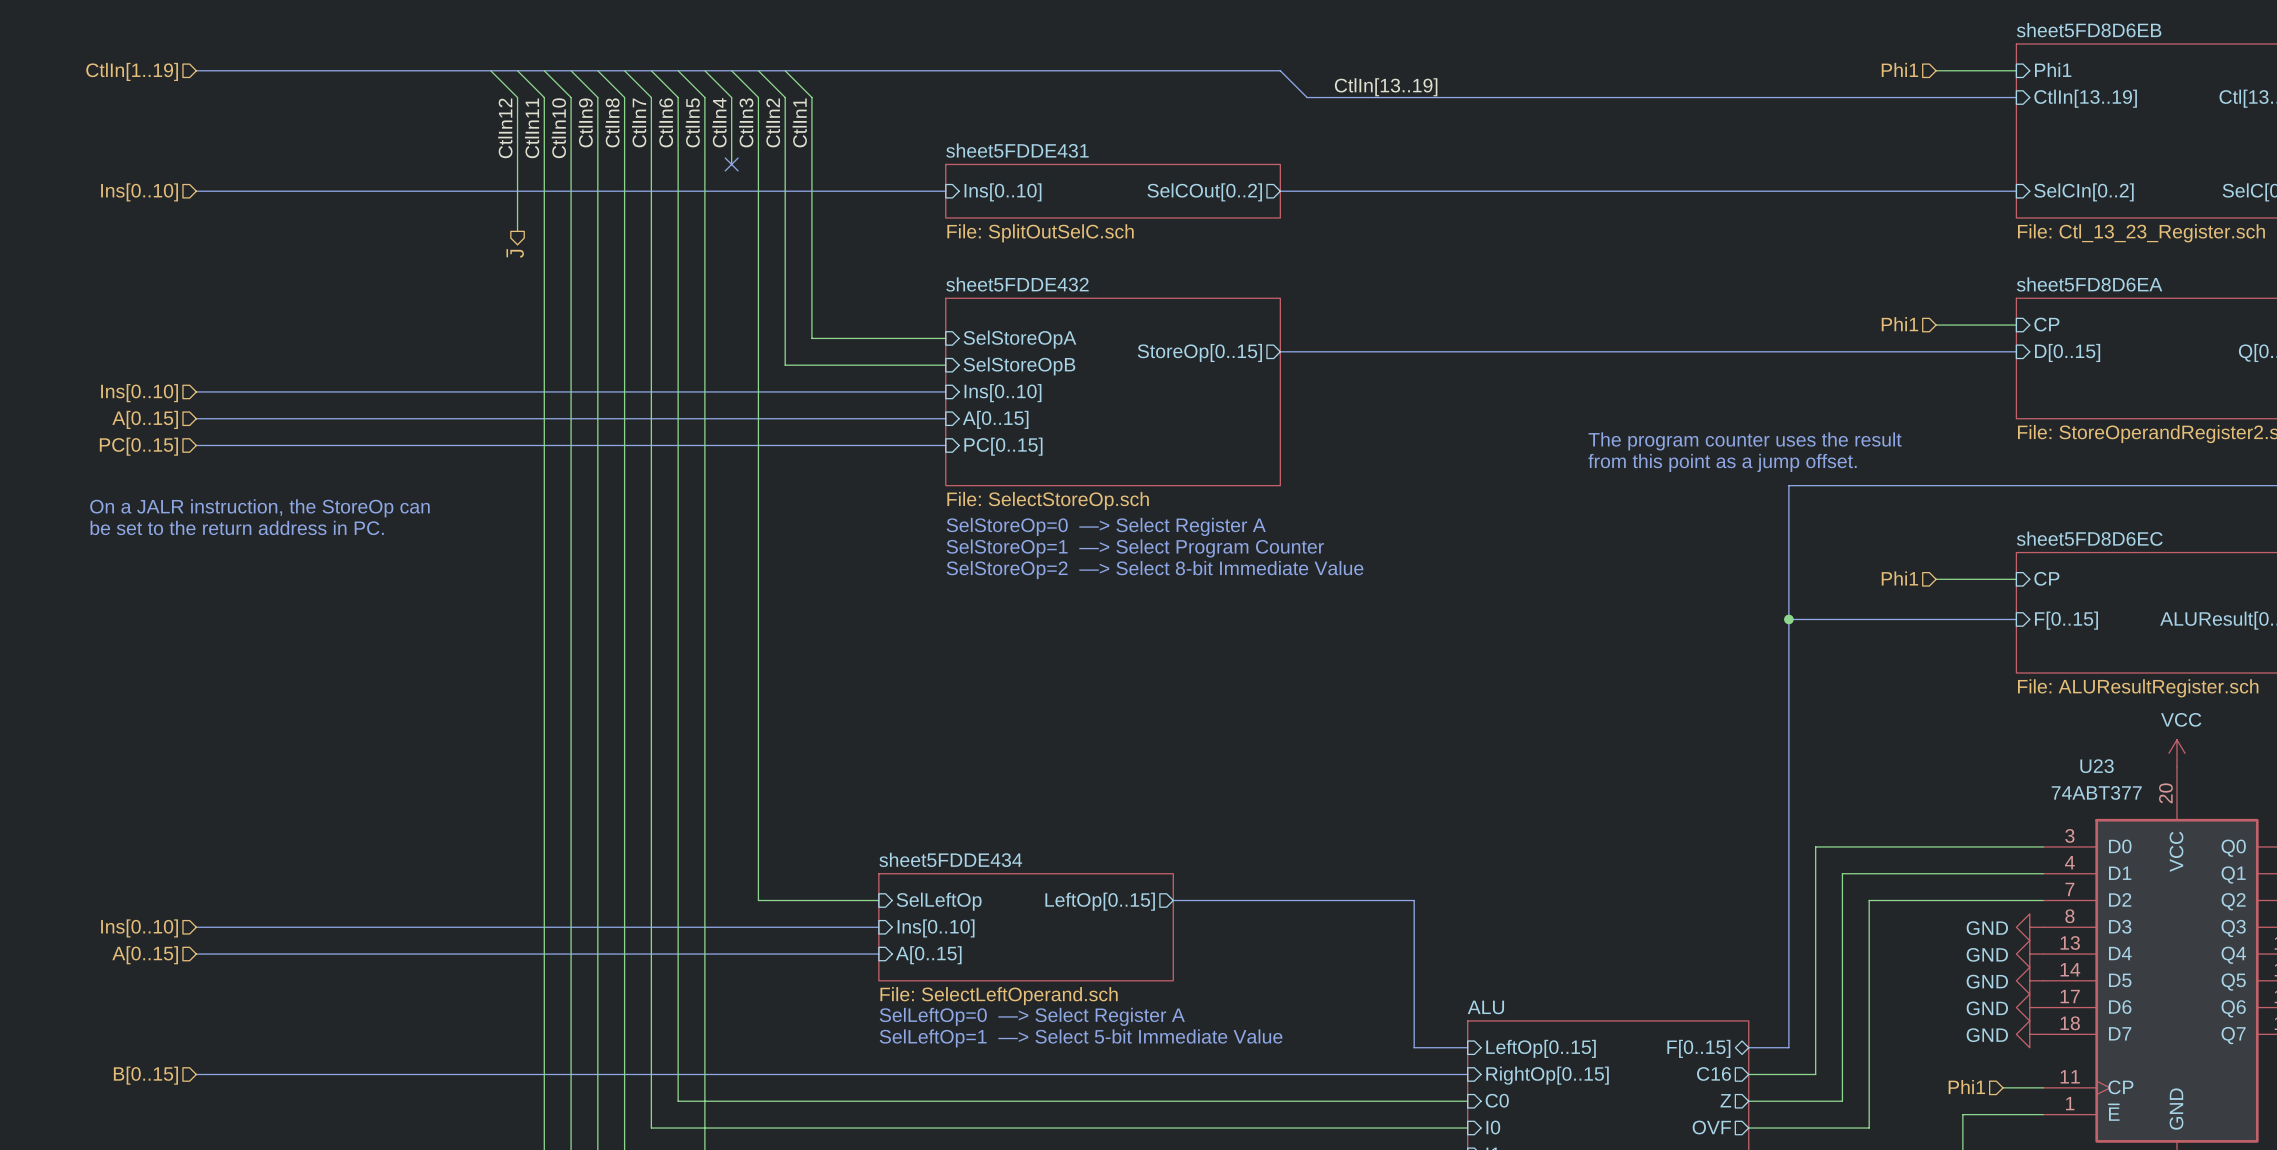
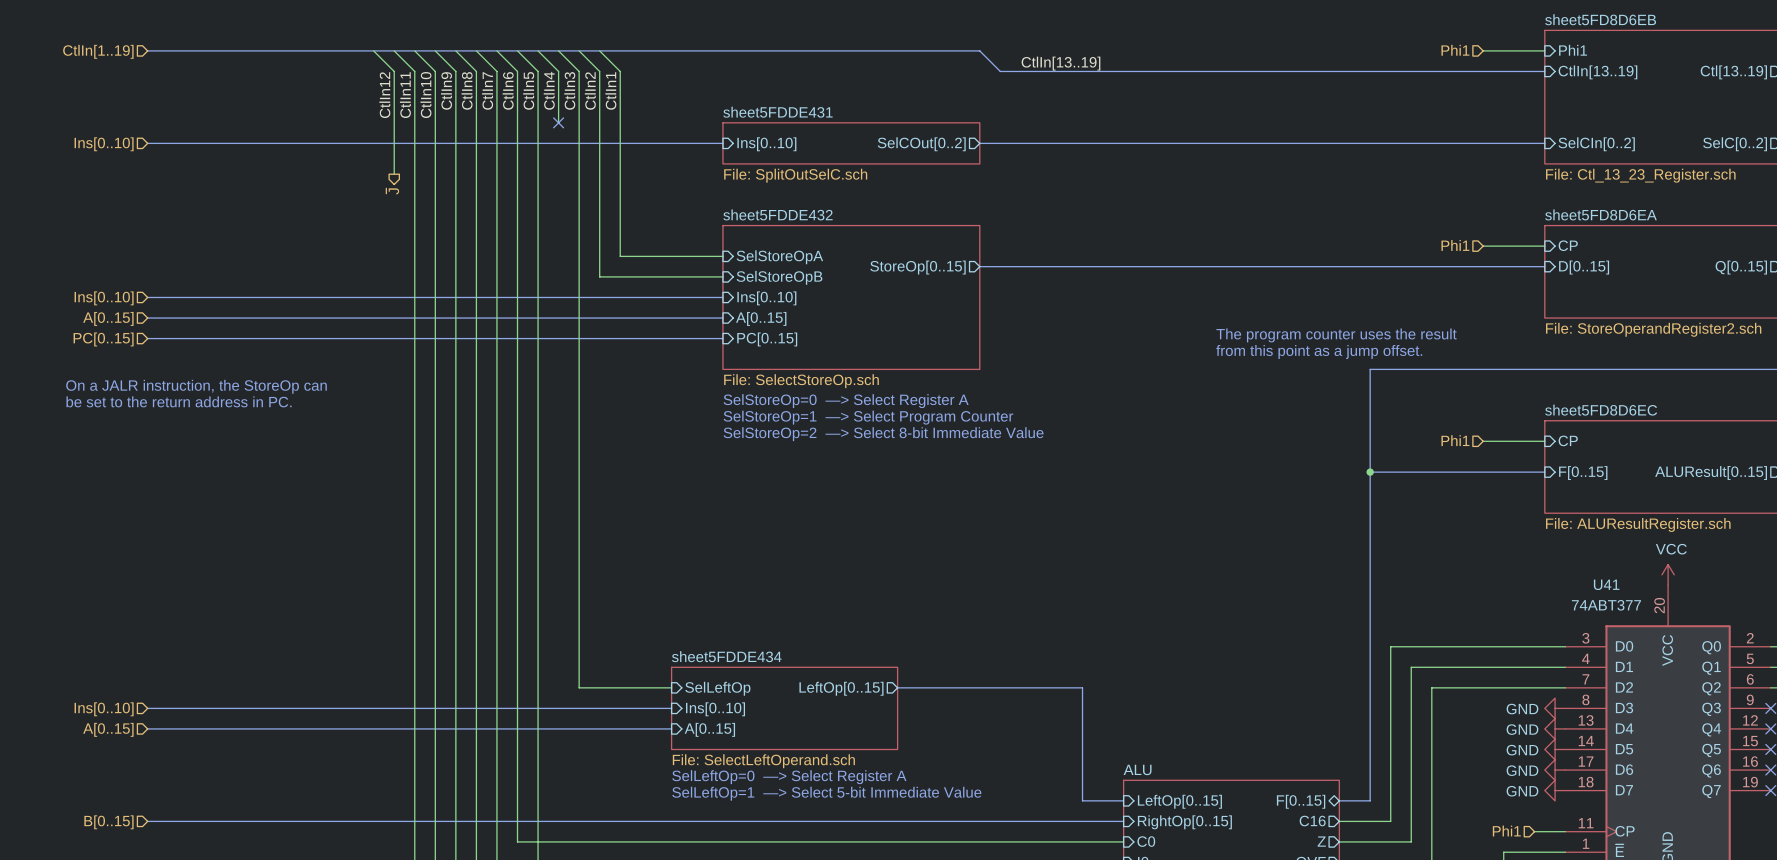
U23 name: U23 (2097, 766) -> U41 (1606, 584)

